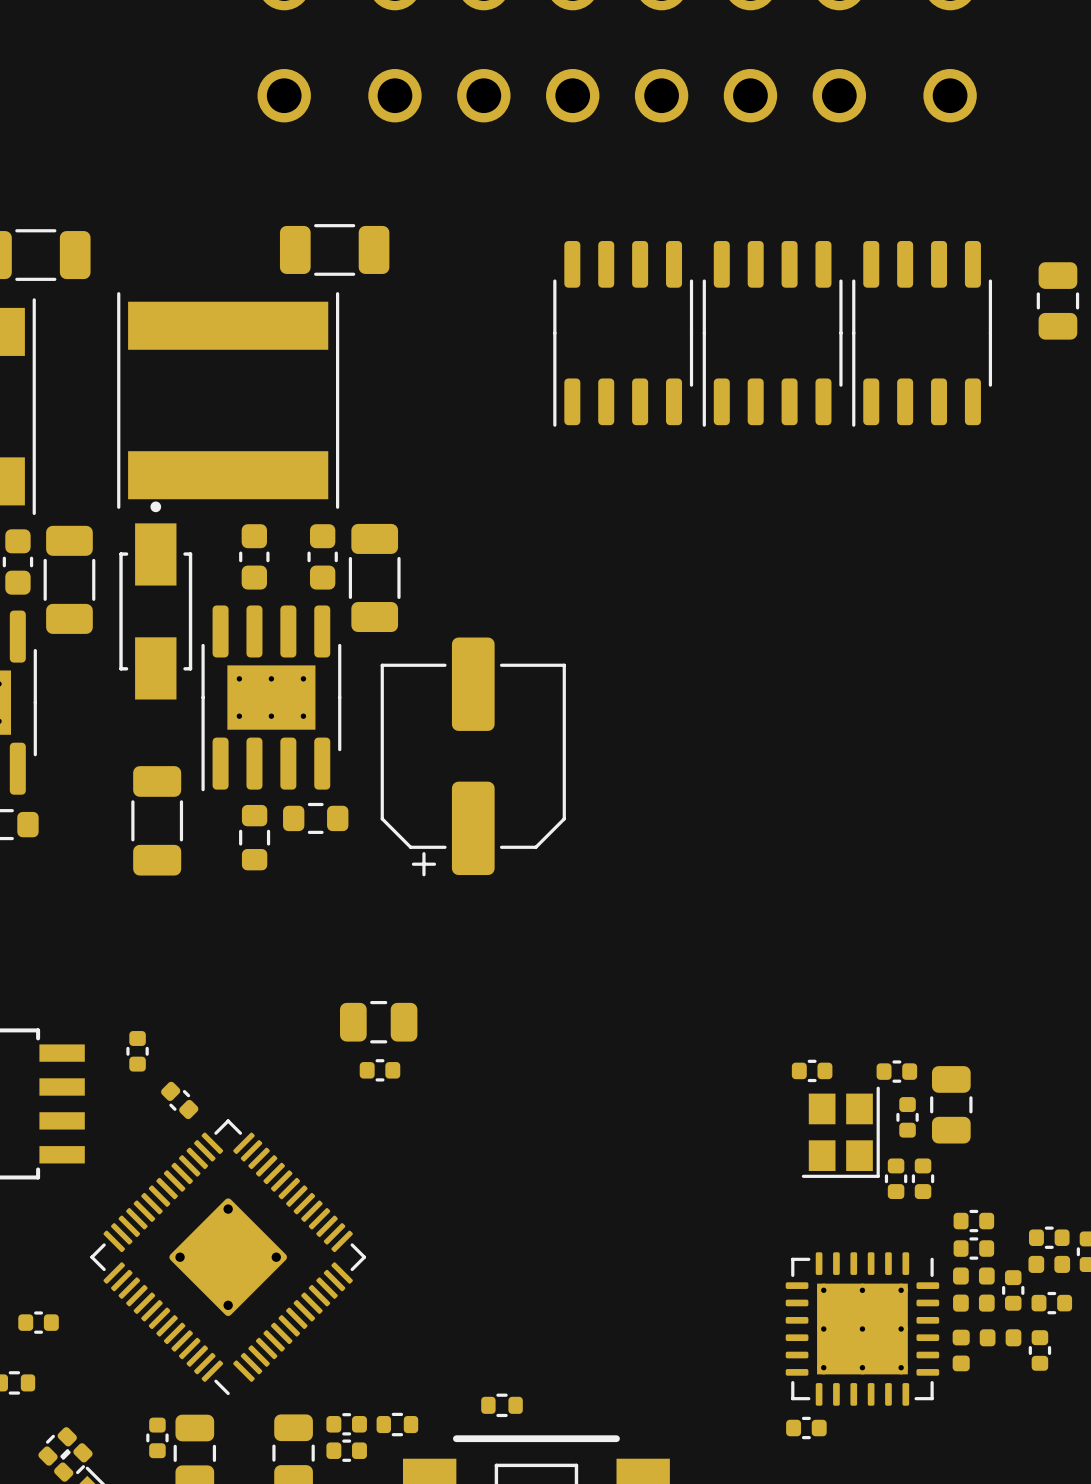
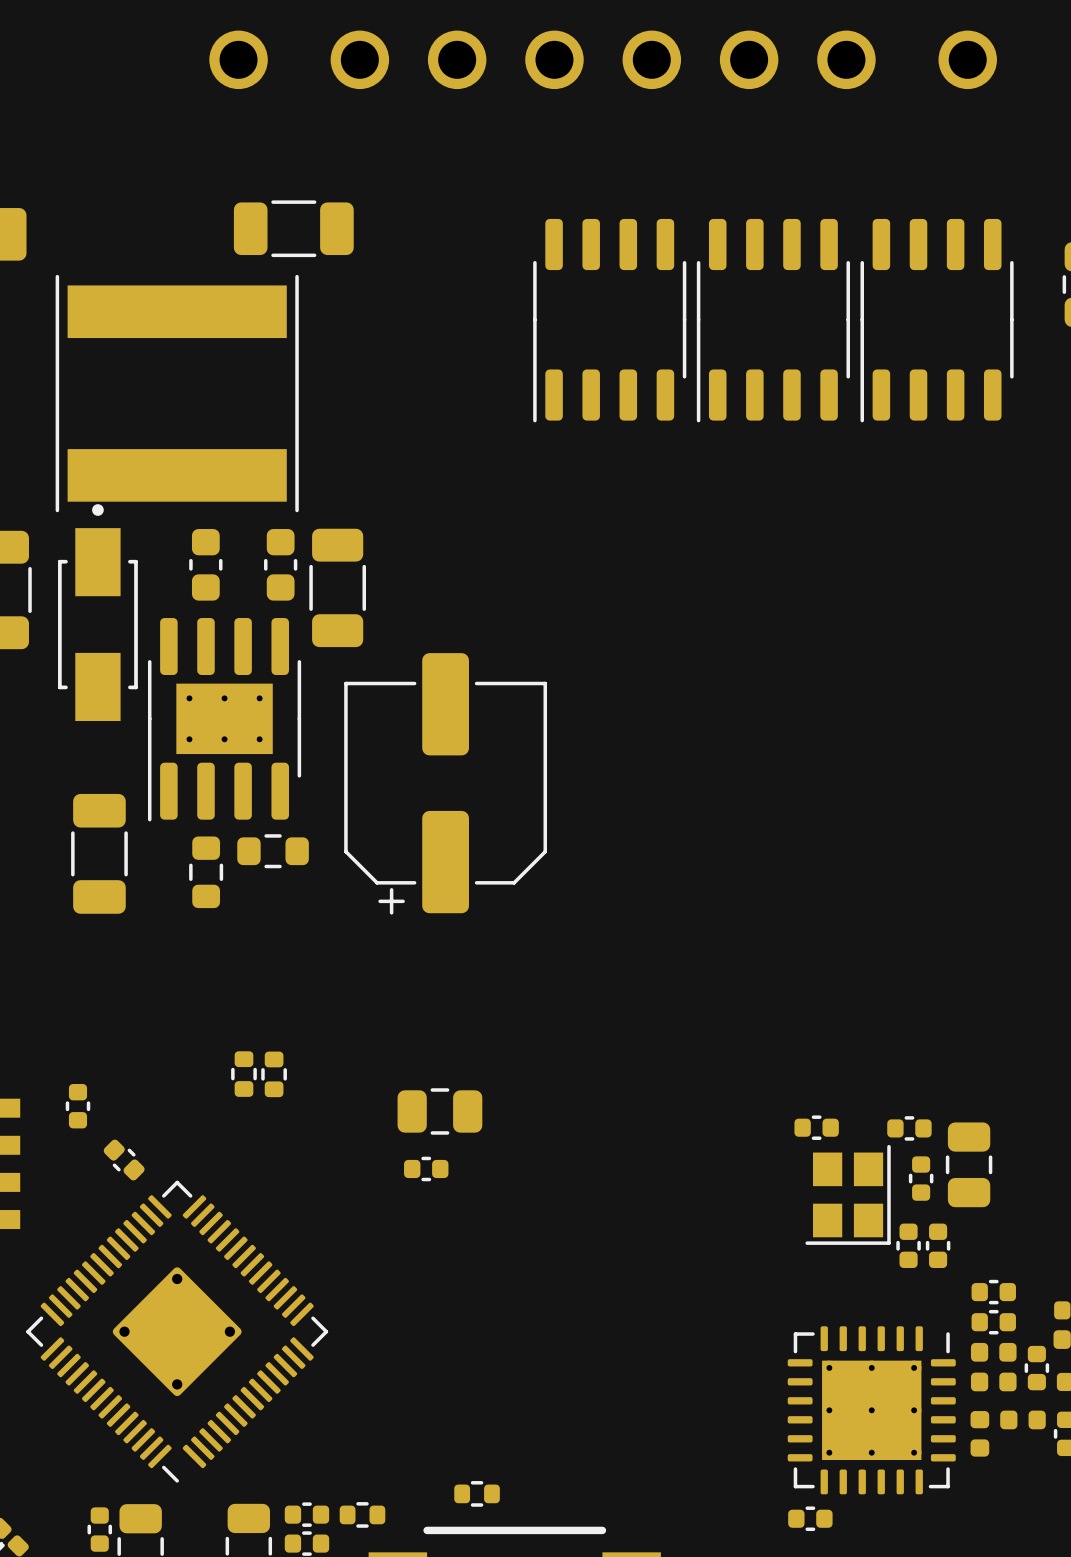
part: none -> (243, 1074)
part: none -> (274, 1074)
part position: (378, 1022) -> (439, 1111)
part position: (379, 1070) -> (426, 1168)

